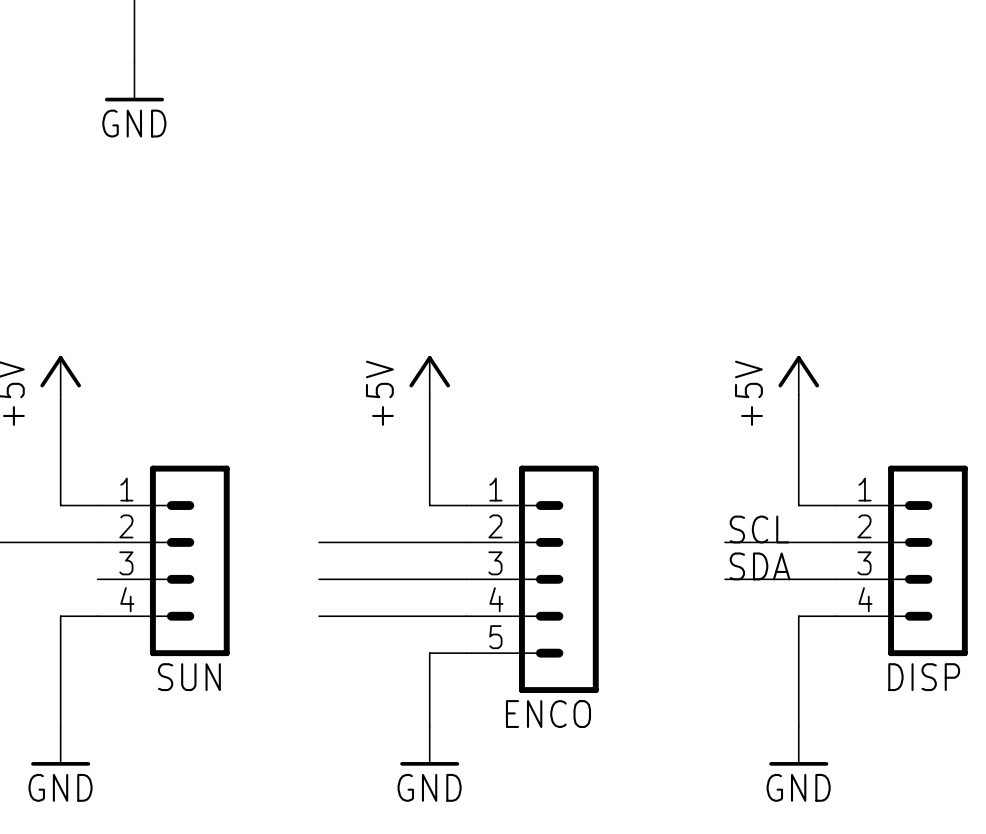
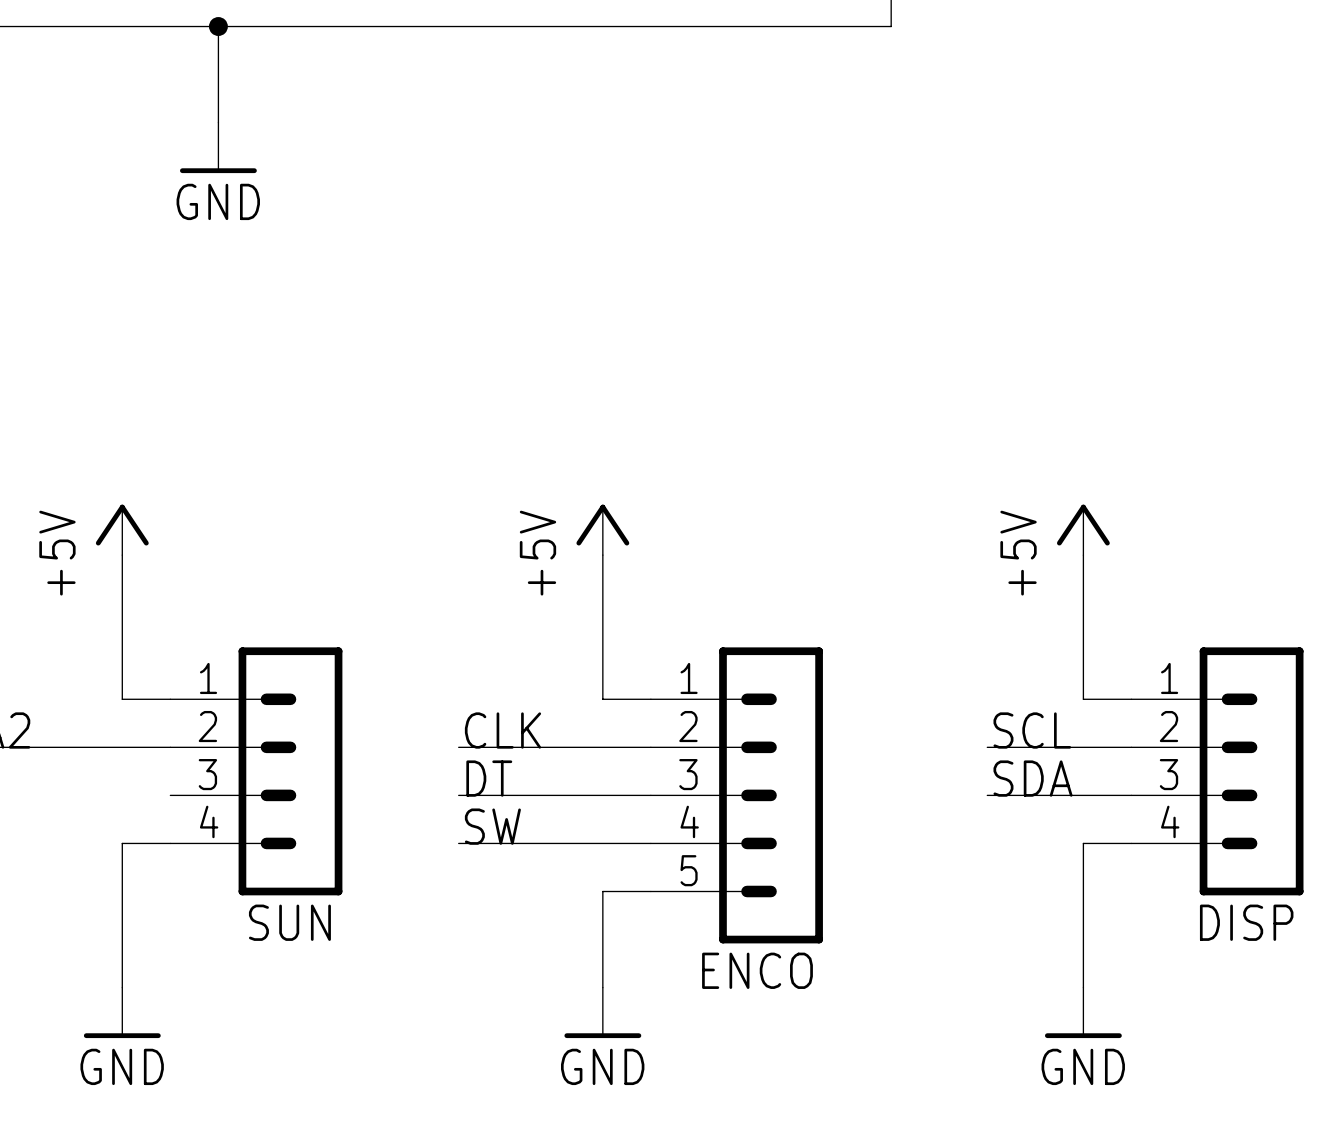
label: none -> CLK (502, 730)
label: none -> DT (489, 778)
label: none -> SW (492, 826)

